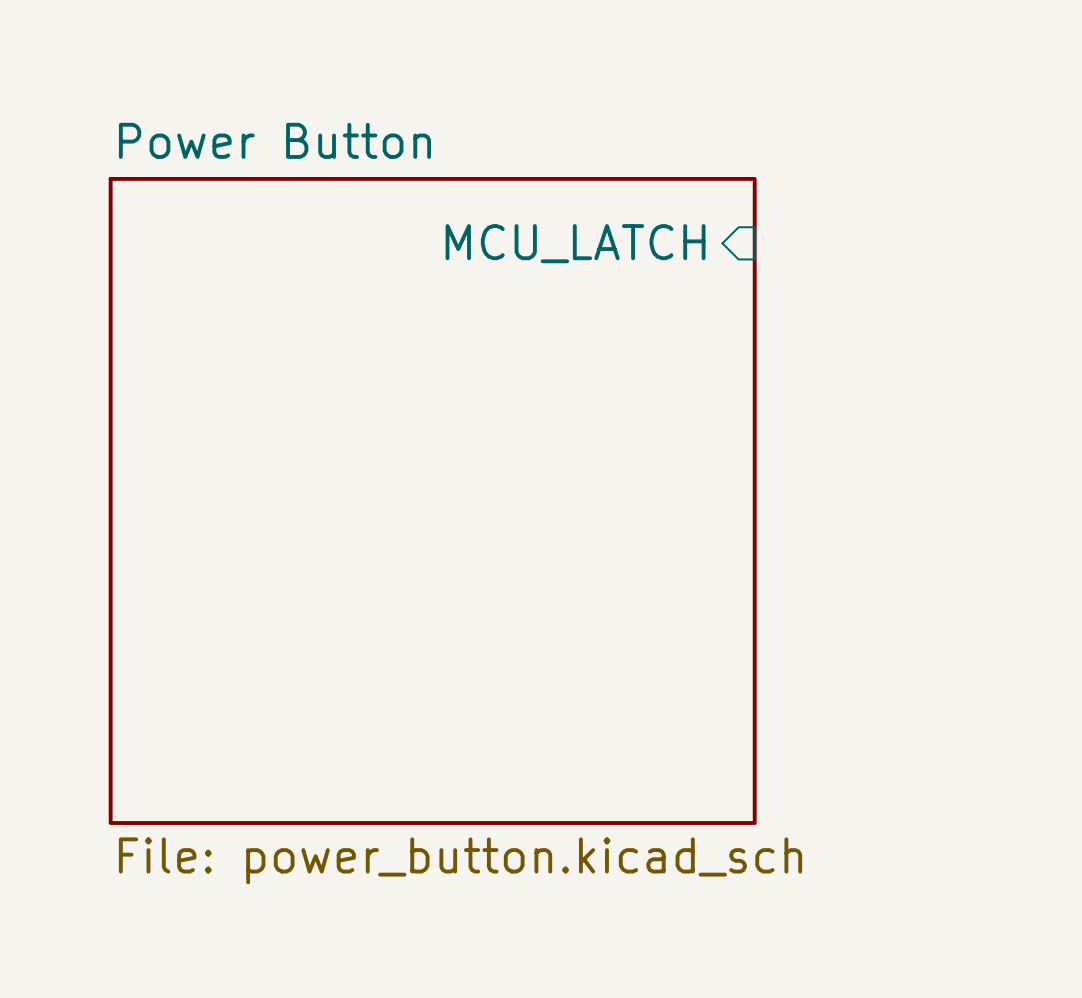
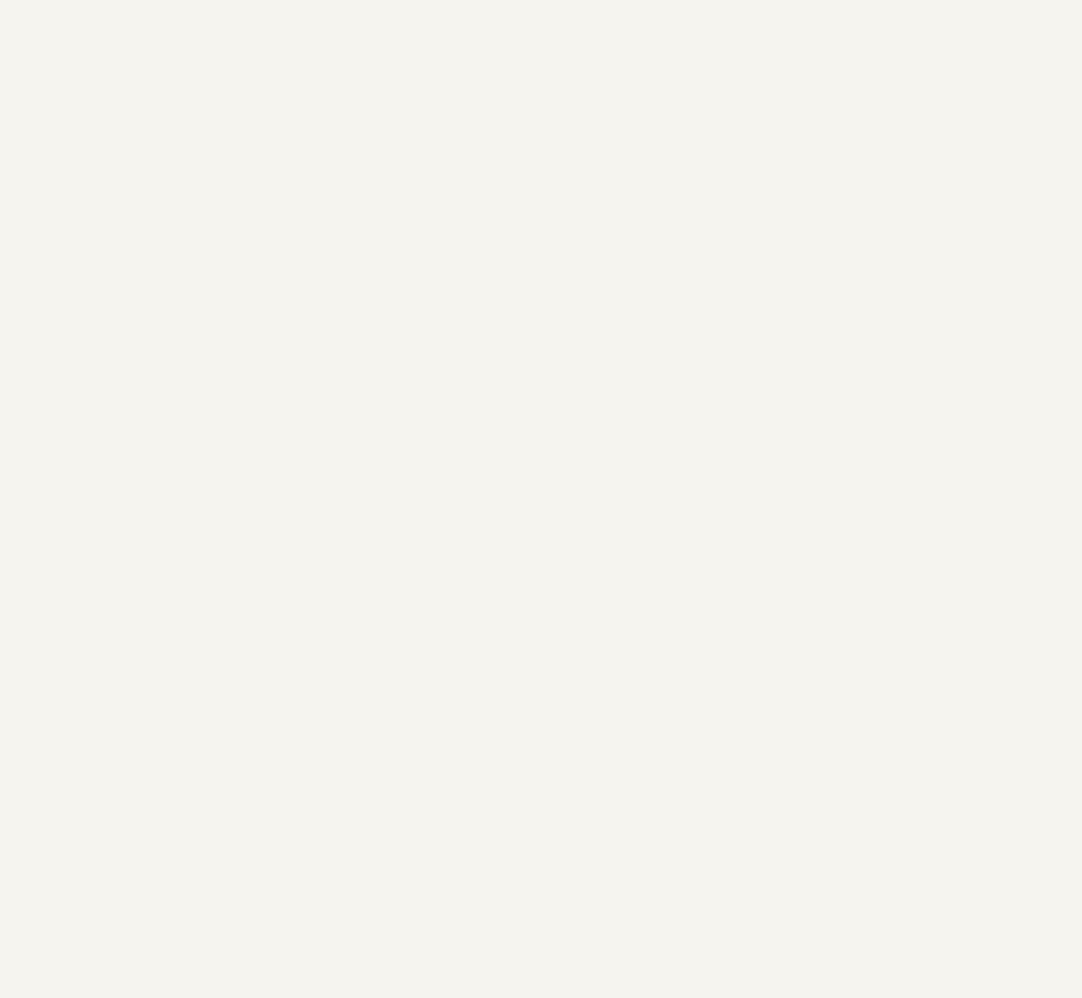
sheet pin: MCU_LATCH (575, 243) -> none
sheet Power Button: File: power_button.kicad_sch (432, 500) -> none

